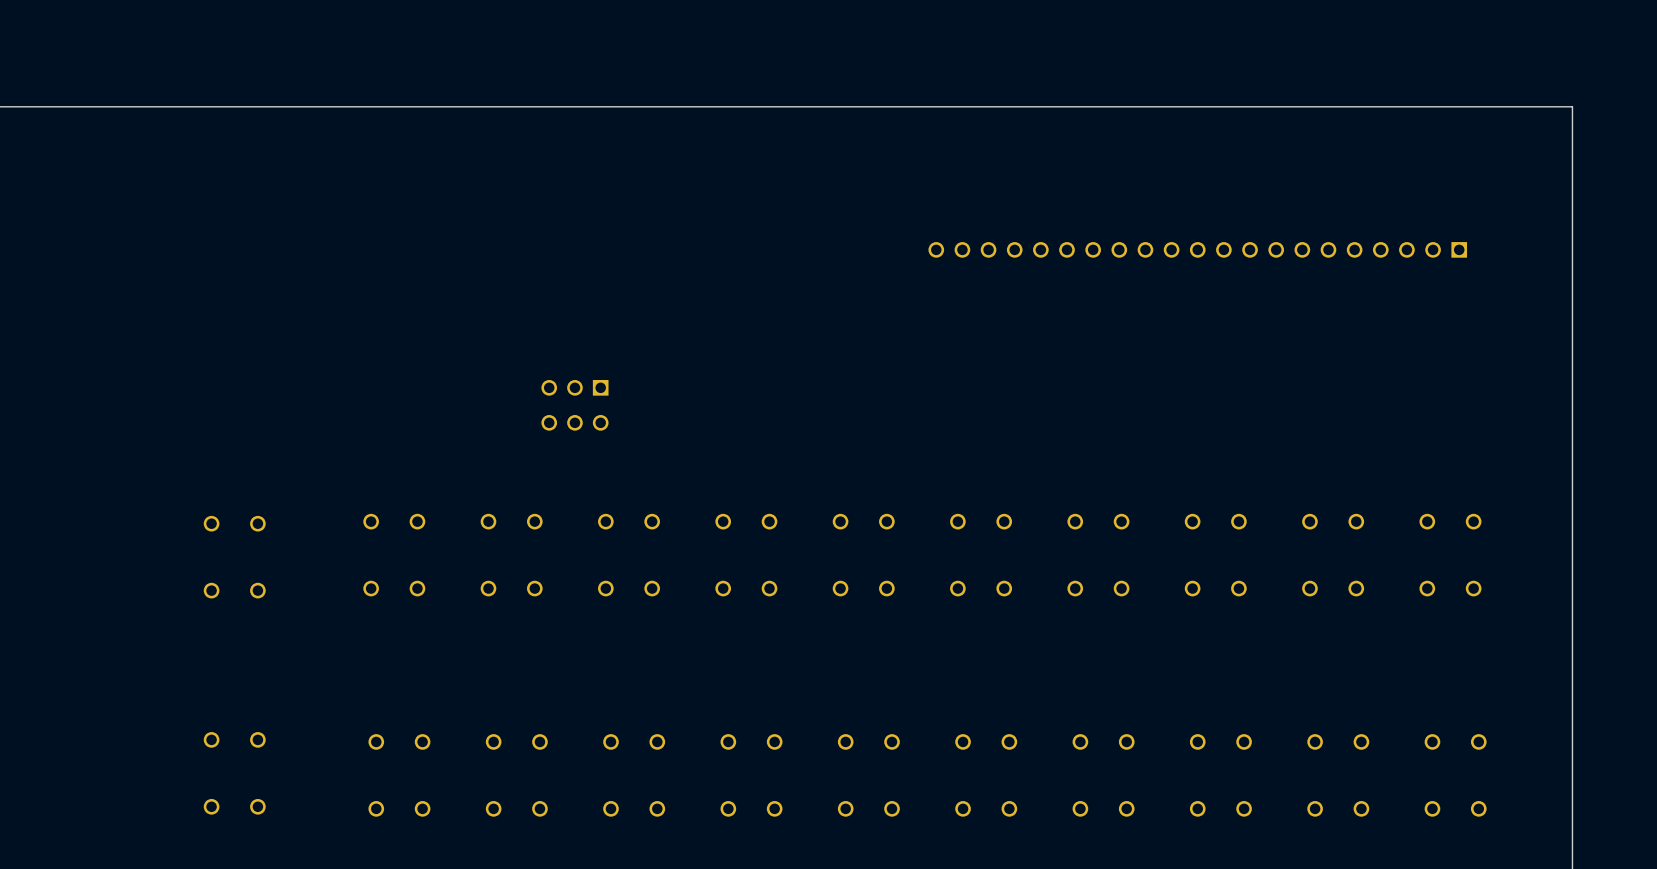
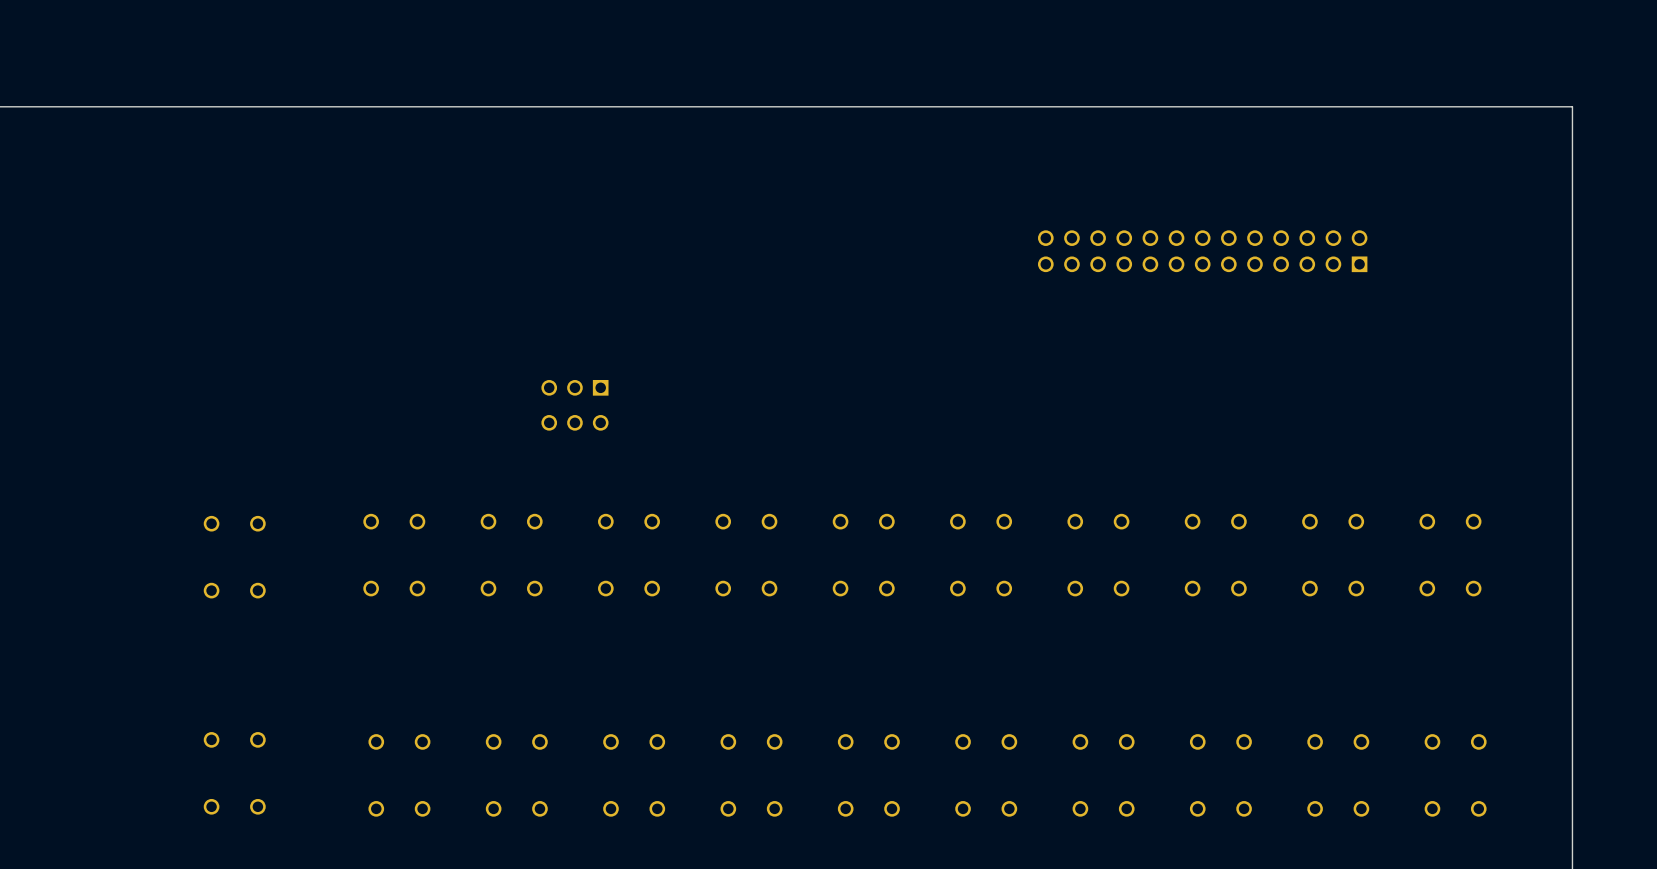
part footprint: [928, 242, 1468, 258] -> [1037, 230, 1368, 273]

